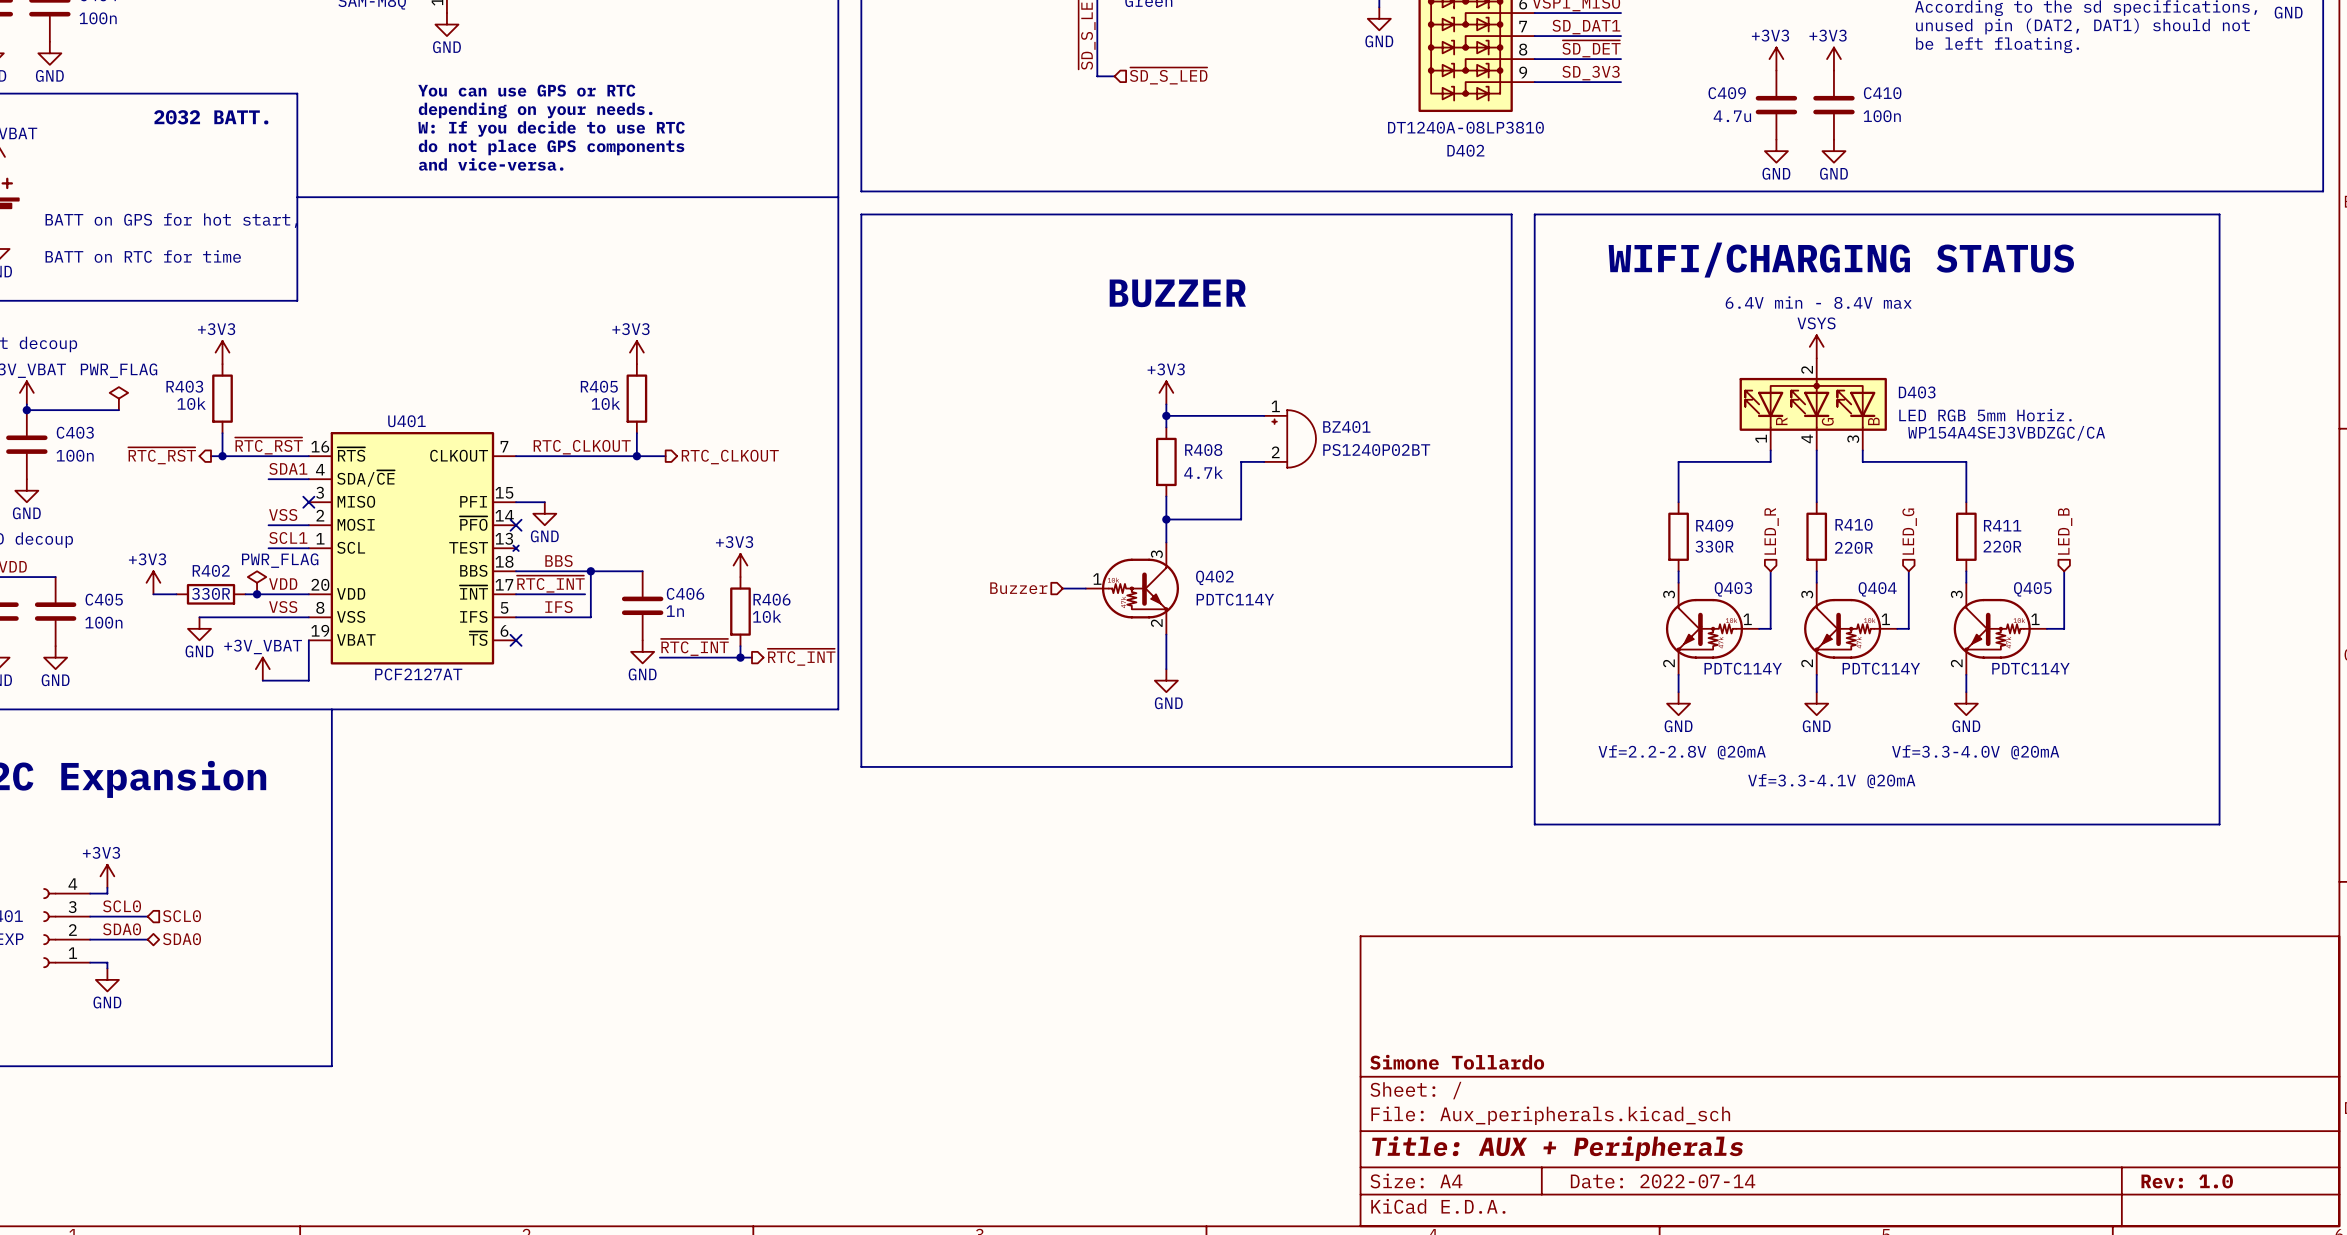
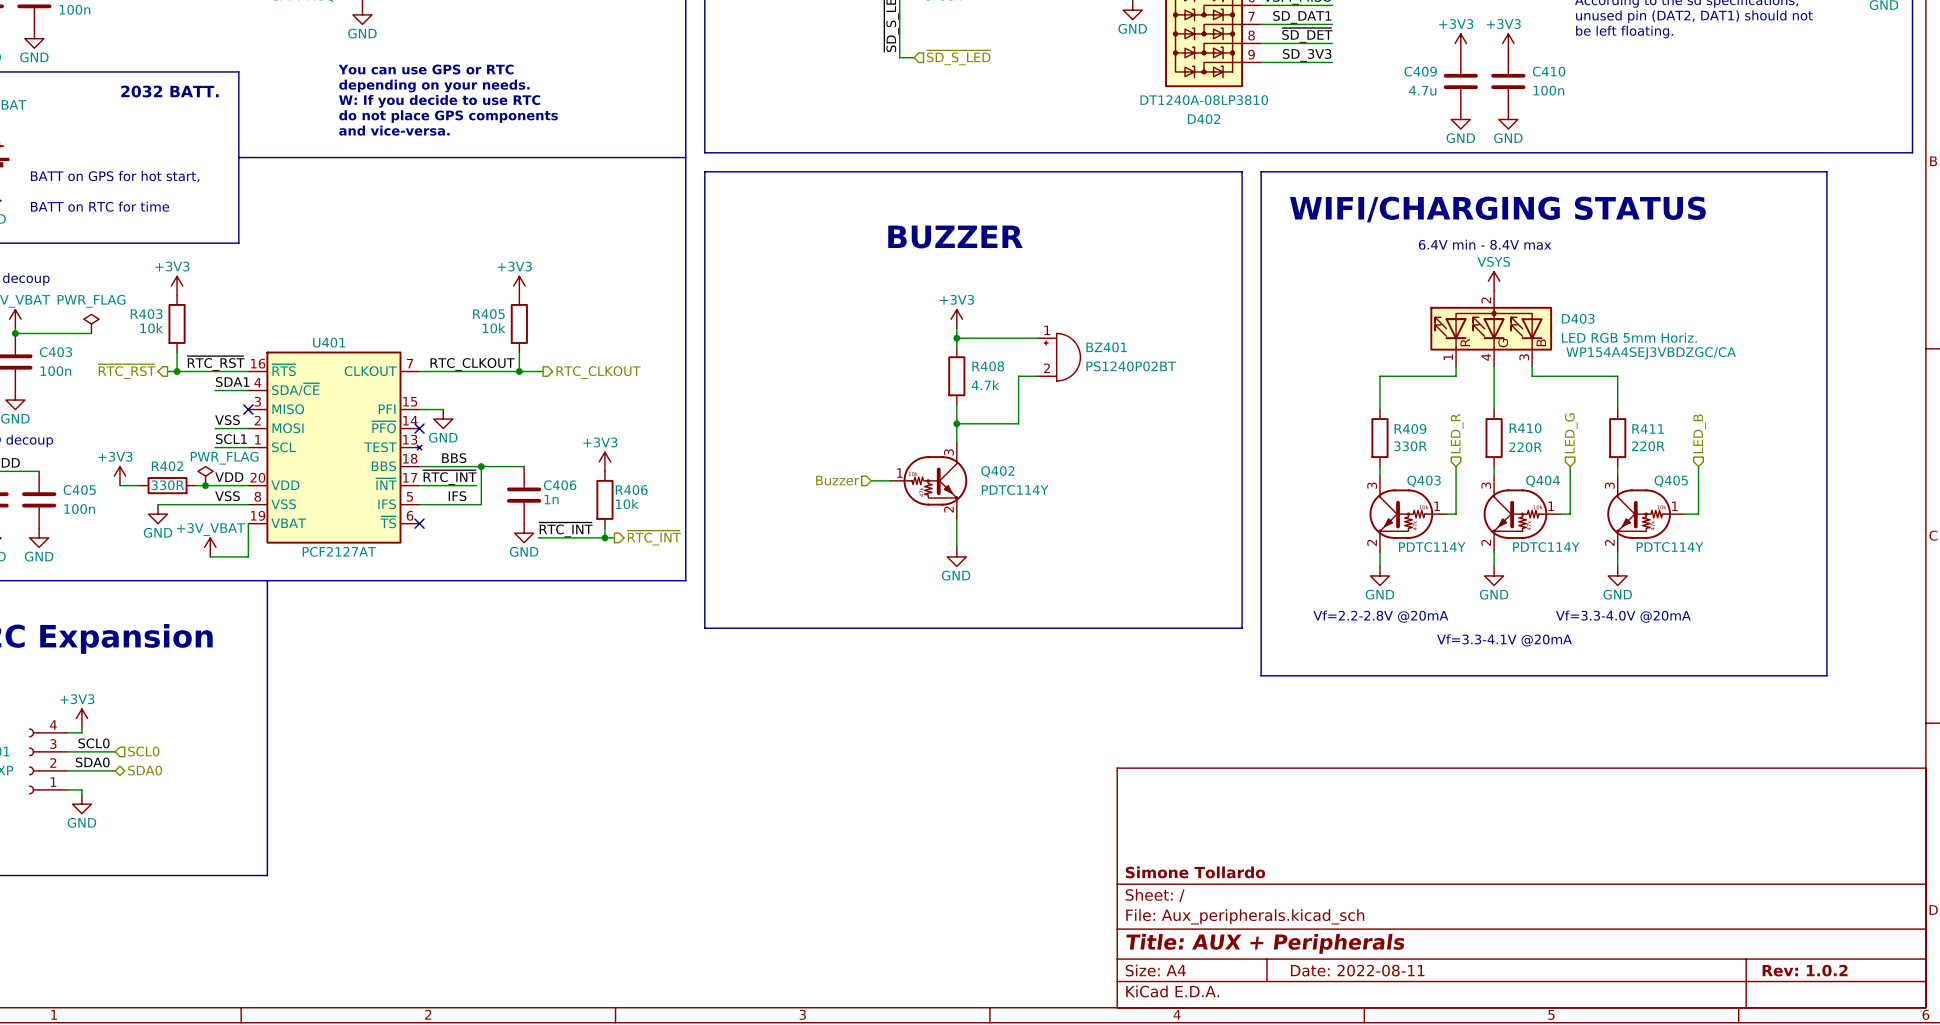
title block: Date: 2022-07-14 (1663, 1181) -> Date: 2022-08-11 (1357, 970)
title block: Rev: 1.0 (2187, 1181) -> Rev: 1.0.2 (1805, 970)

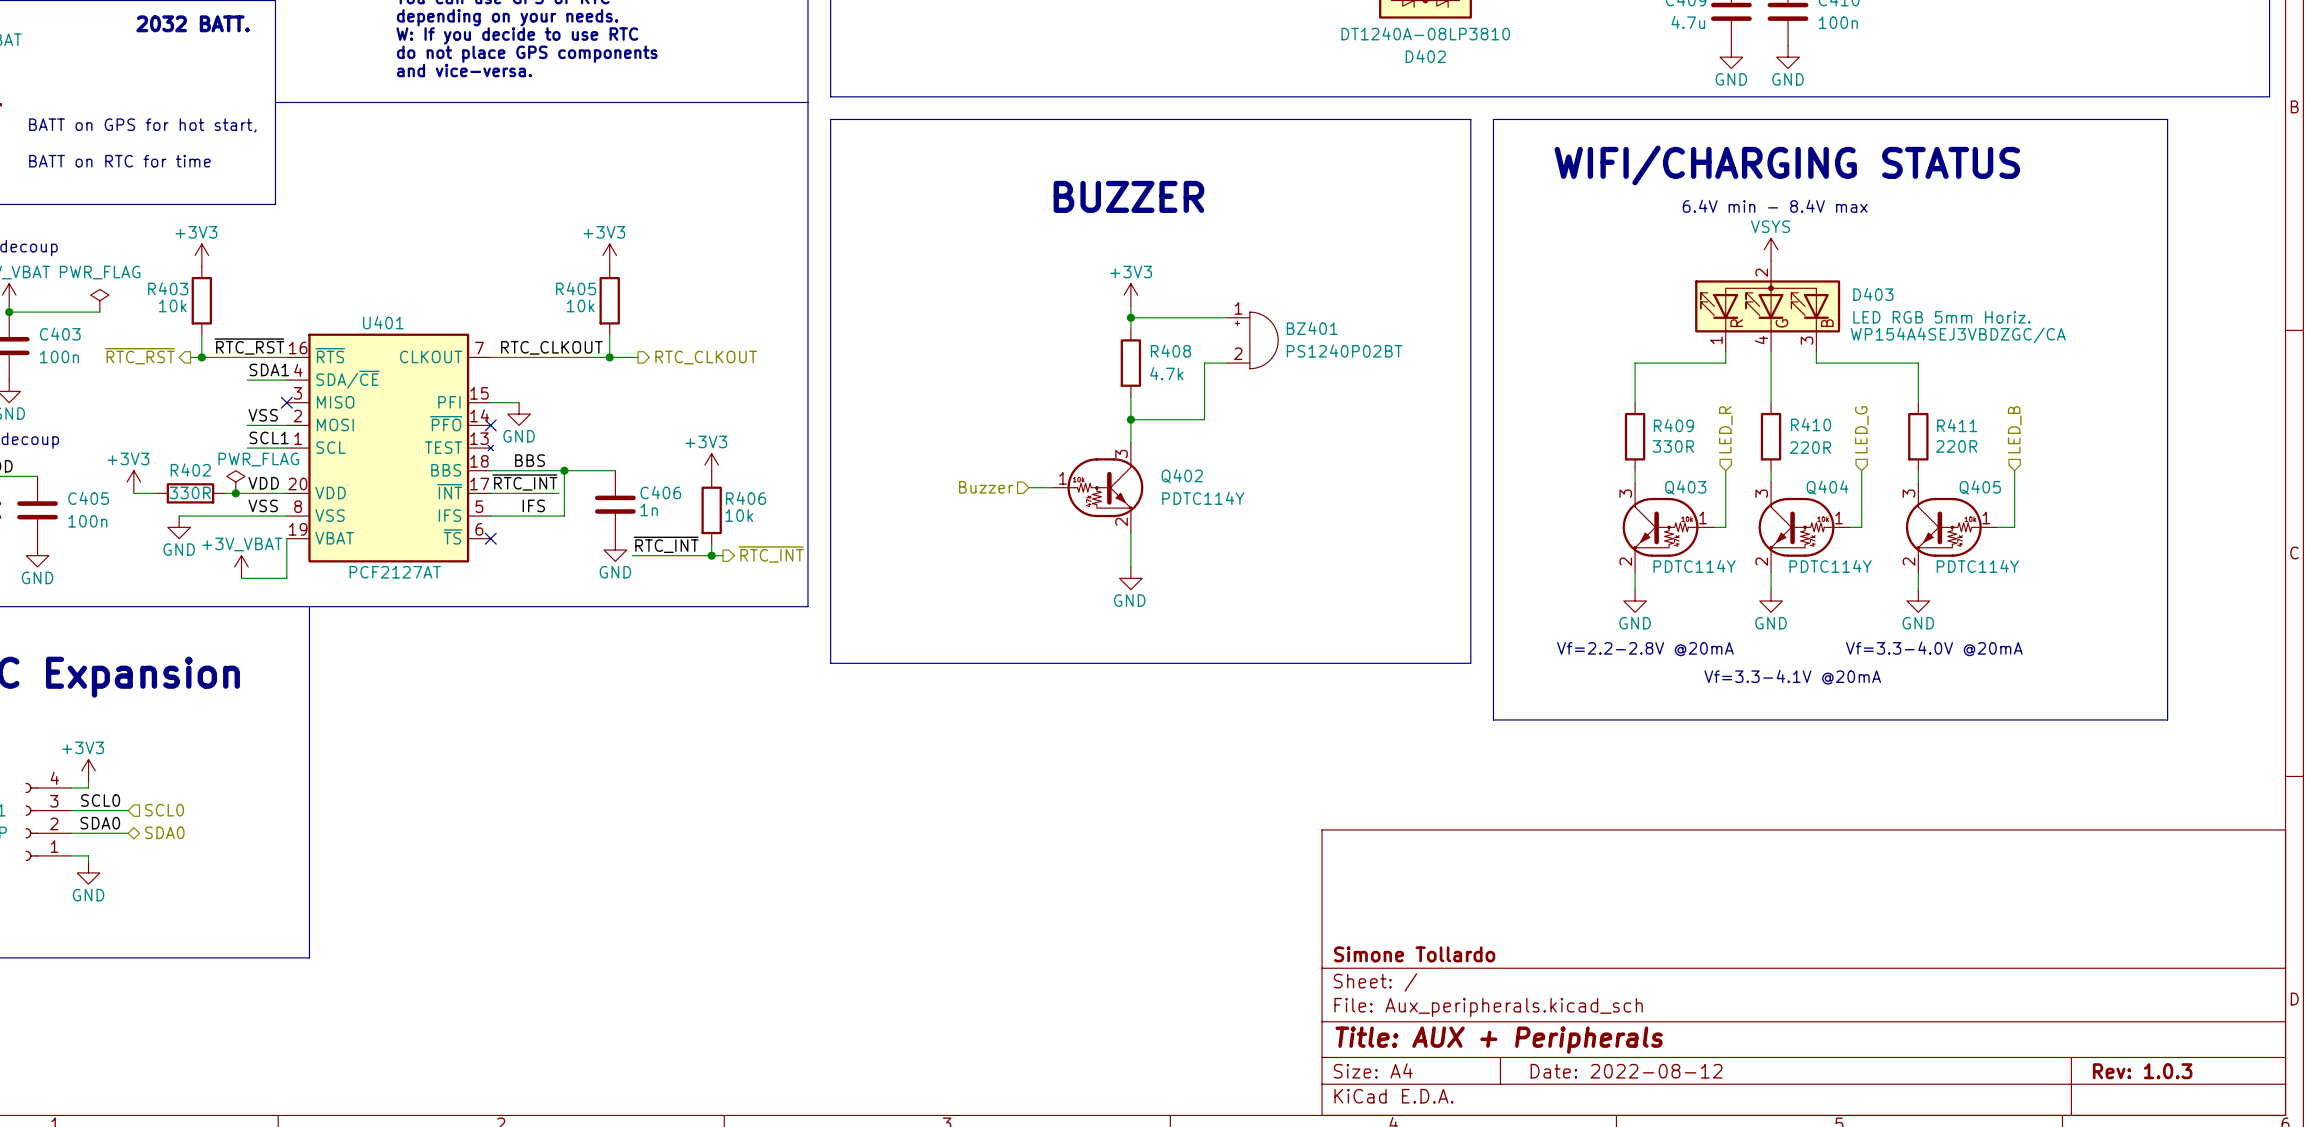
title block: Date: 2022-08-11 (1357, 970) -> Date: 2022-08-12 (1626, 1071)
title block: Rev: 1.0.2 (1805, 970) -> Rev: 1.0.3 (2142, 1071)

